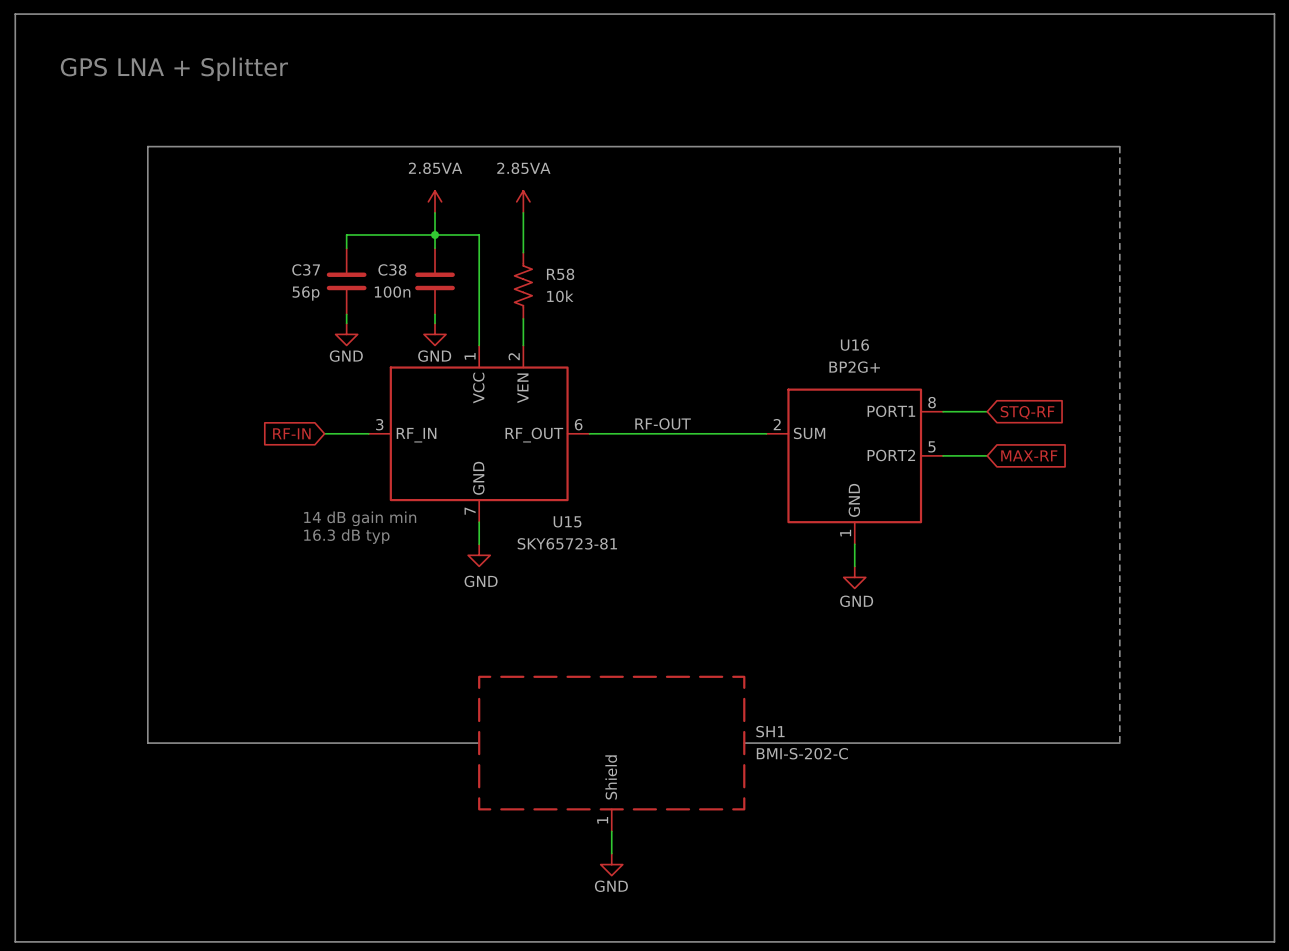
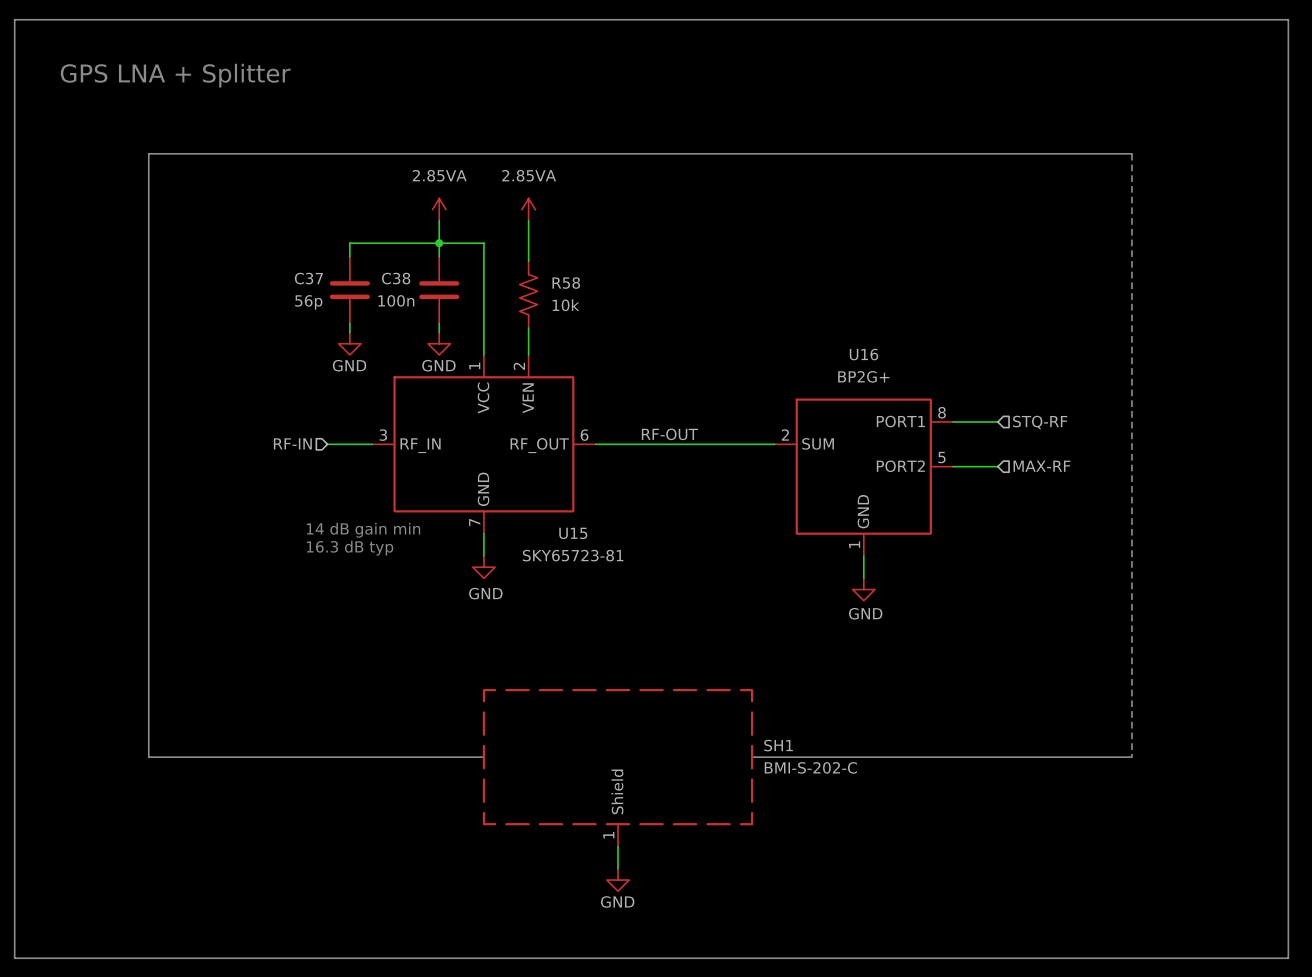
global label: STQ-RF (1027, 412) -> none
hierarchical label: none -> STQ-RF (1040, 422)
hierarchical label: none -> RF-IN (292, 443)
global label: RF-IN (291, 433) -> none
global label: MAX-RF (1029, 455) -> none
hierarchical label: none -> MAX-RF (1041, 466)

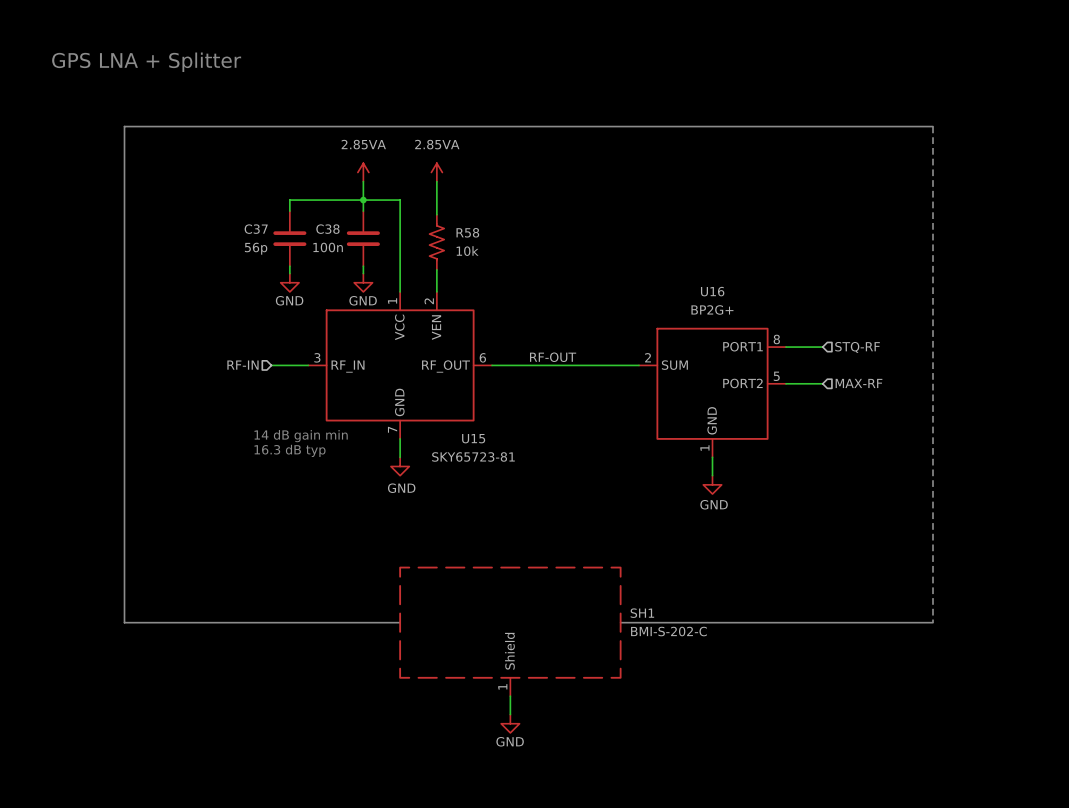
line: (14, 19) (14, 958) (1288, 958) (1288, 19) (14, 19) -> none

